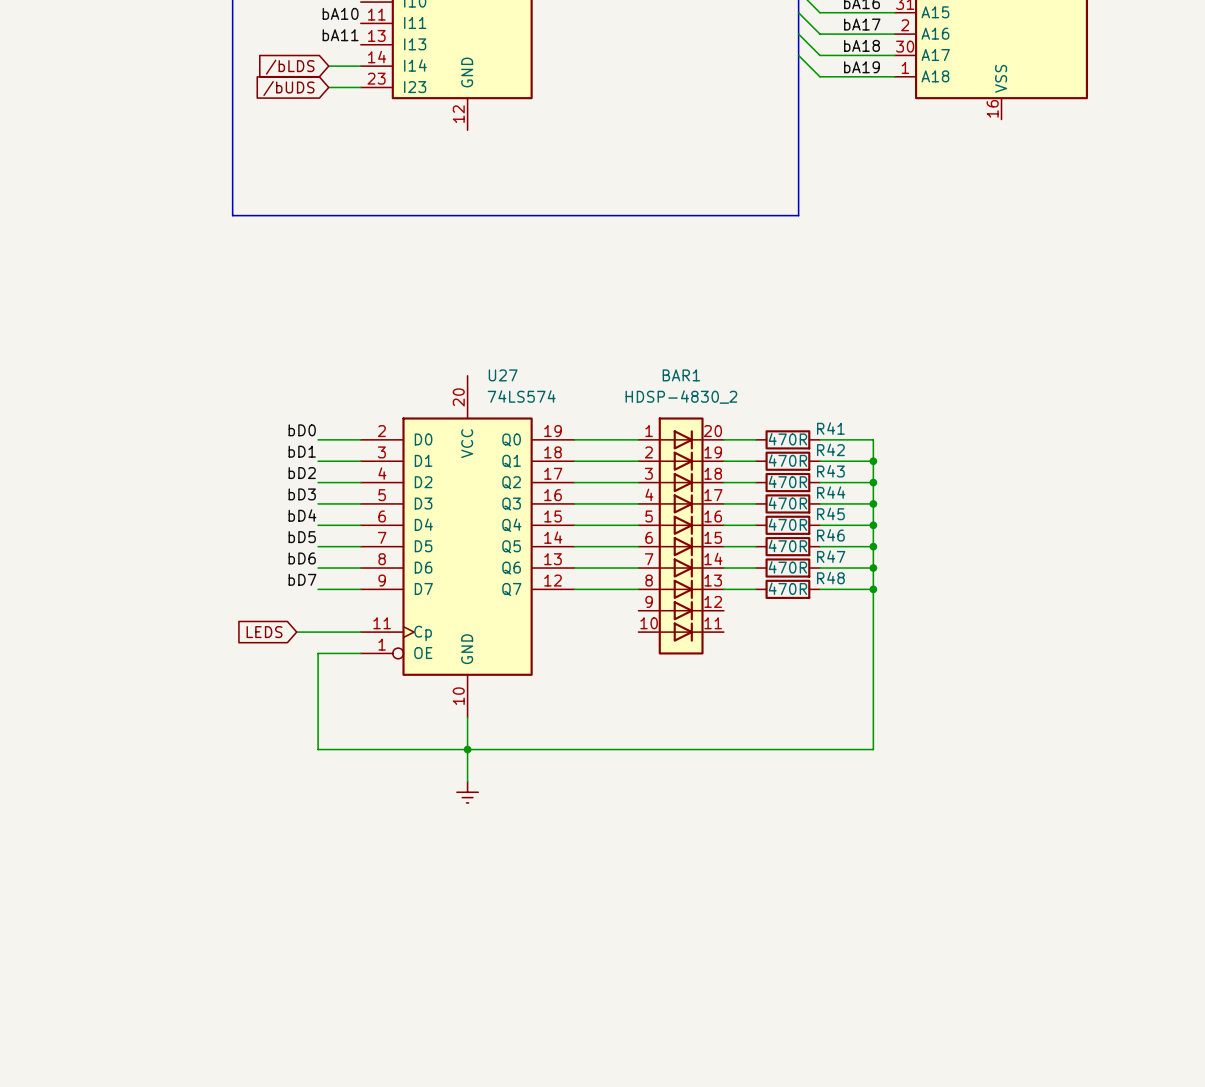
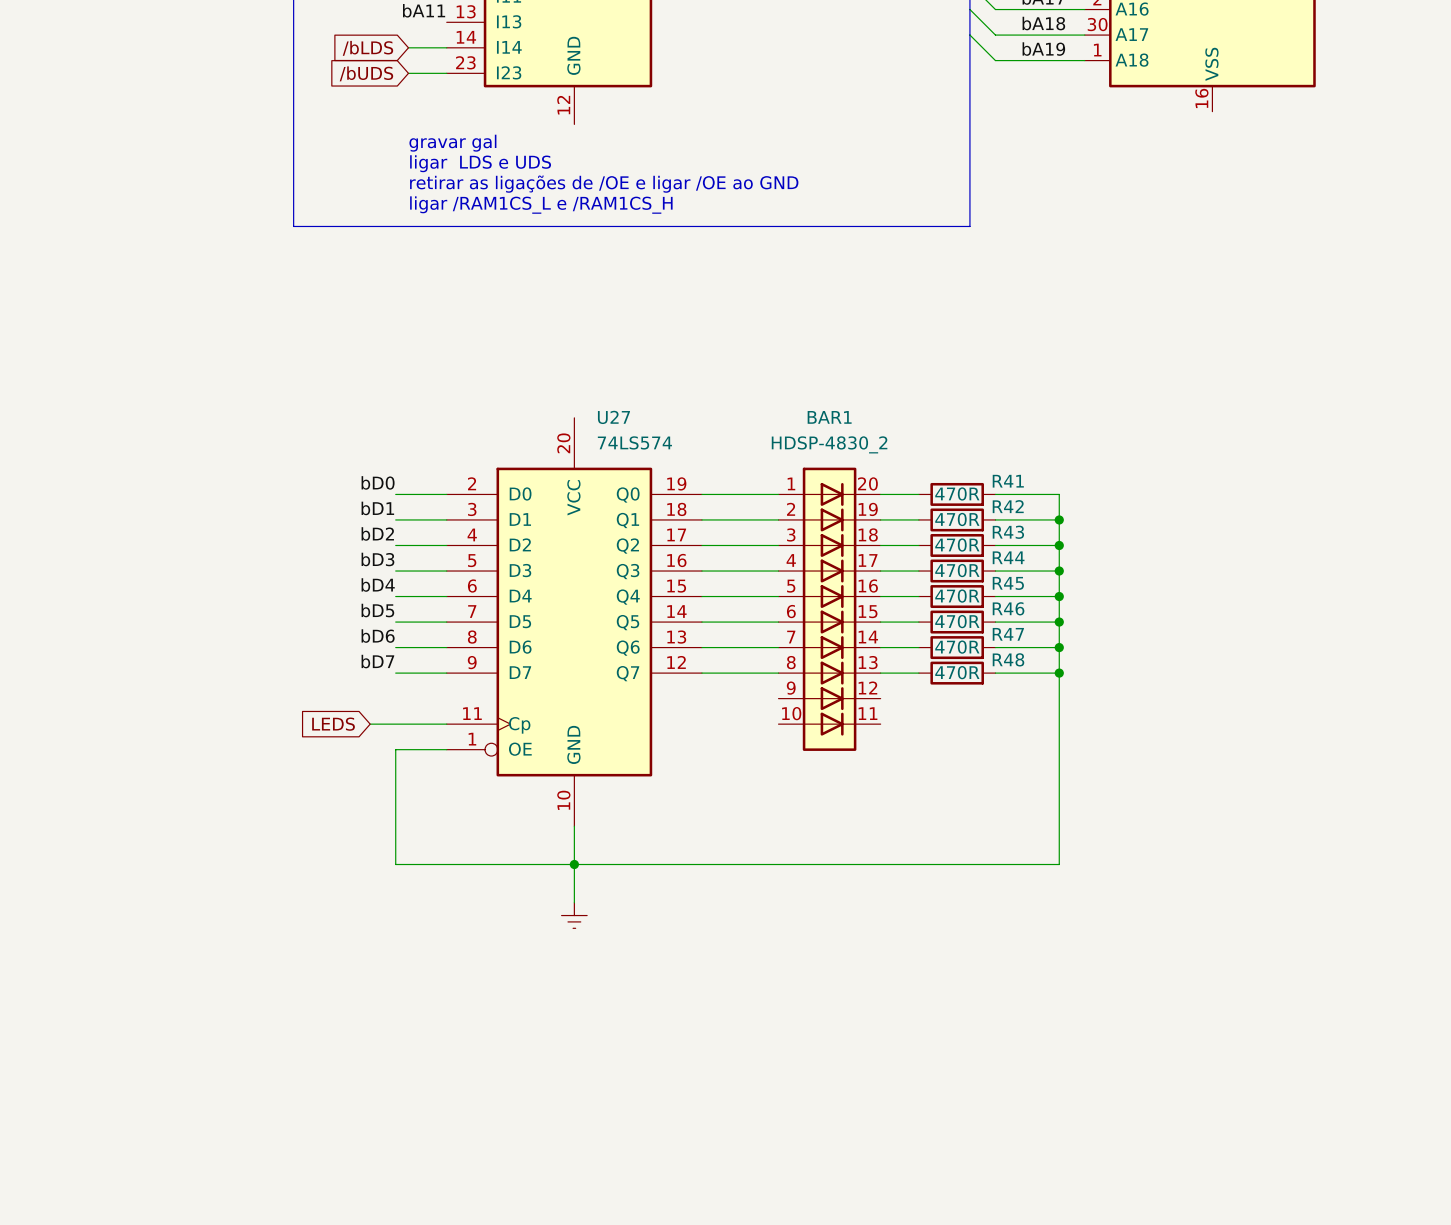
text: none -> gravar gal (452, 143)
text: none -> ligar LDS e UDS (480, 163)
text: none -> retirar as ligações de /OE e ligar /OE ao GND (604, 184)
text: none -> ligar /RAM1CS_L e /RAM1CS_H (541, 205)

